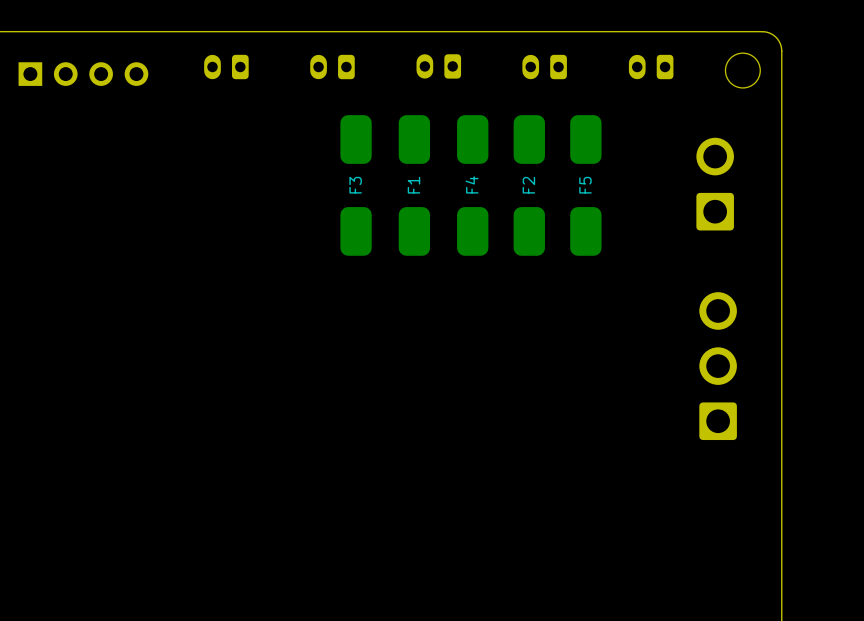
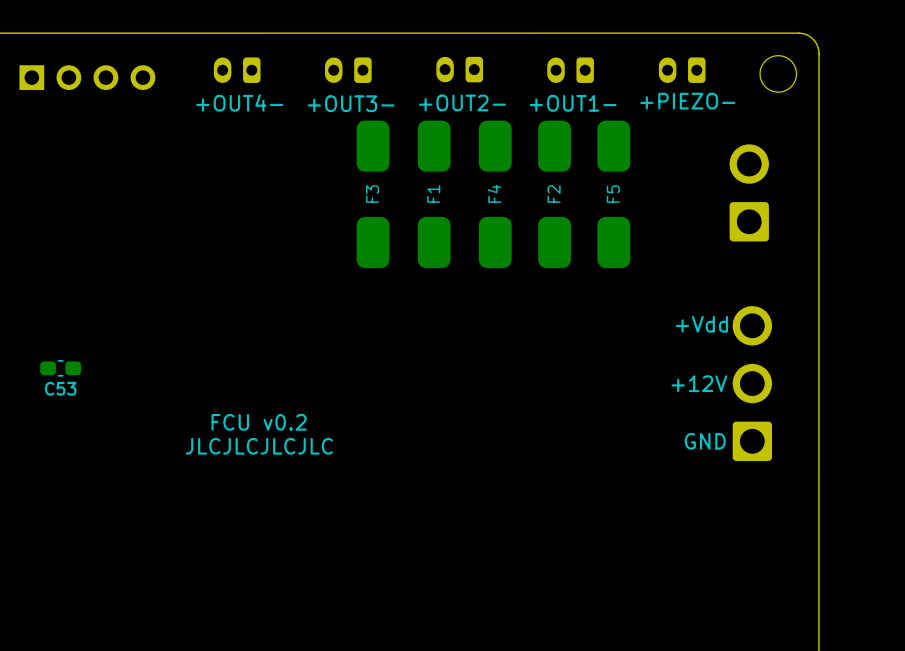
text: none -> +PIEZO- (687, 101)
text: none -> +OUT4- (239, 102)
text: none -> +OUT3- (351, 103)
text: none -> +OUT2- (462, 102)
text: none -> +OUT1- (573, 103)
text: none -> +Vdd (702, 324)
C53: none -> (60, 368)
text: none -> +12V (699, 383)
text: none -> FCU v0.2 (259, 422)
text: none -> GND (705, 441)
text: none -> JLCJLCJLCJLC (259, 446)

